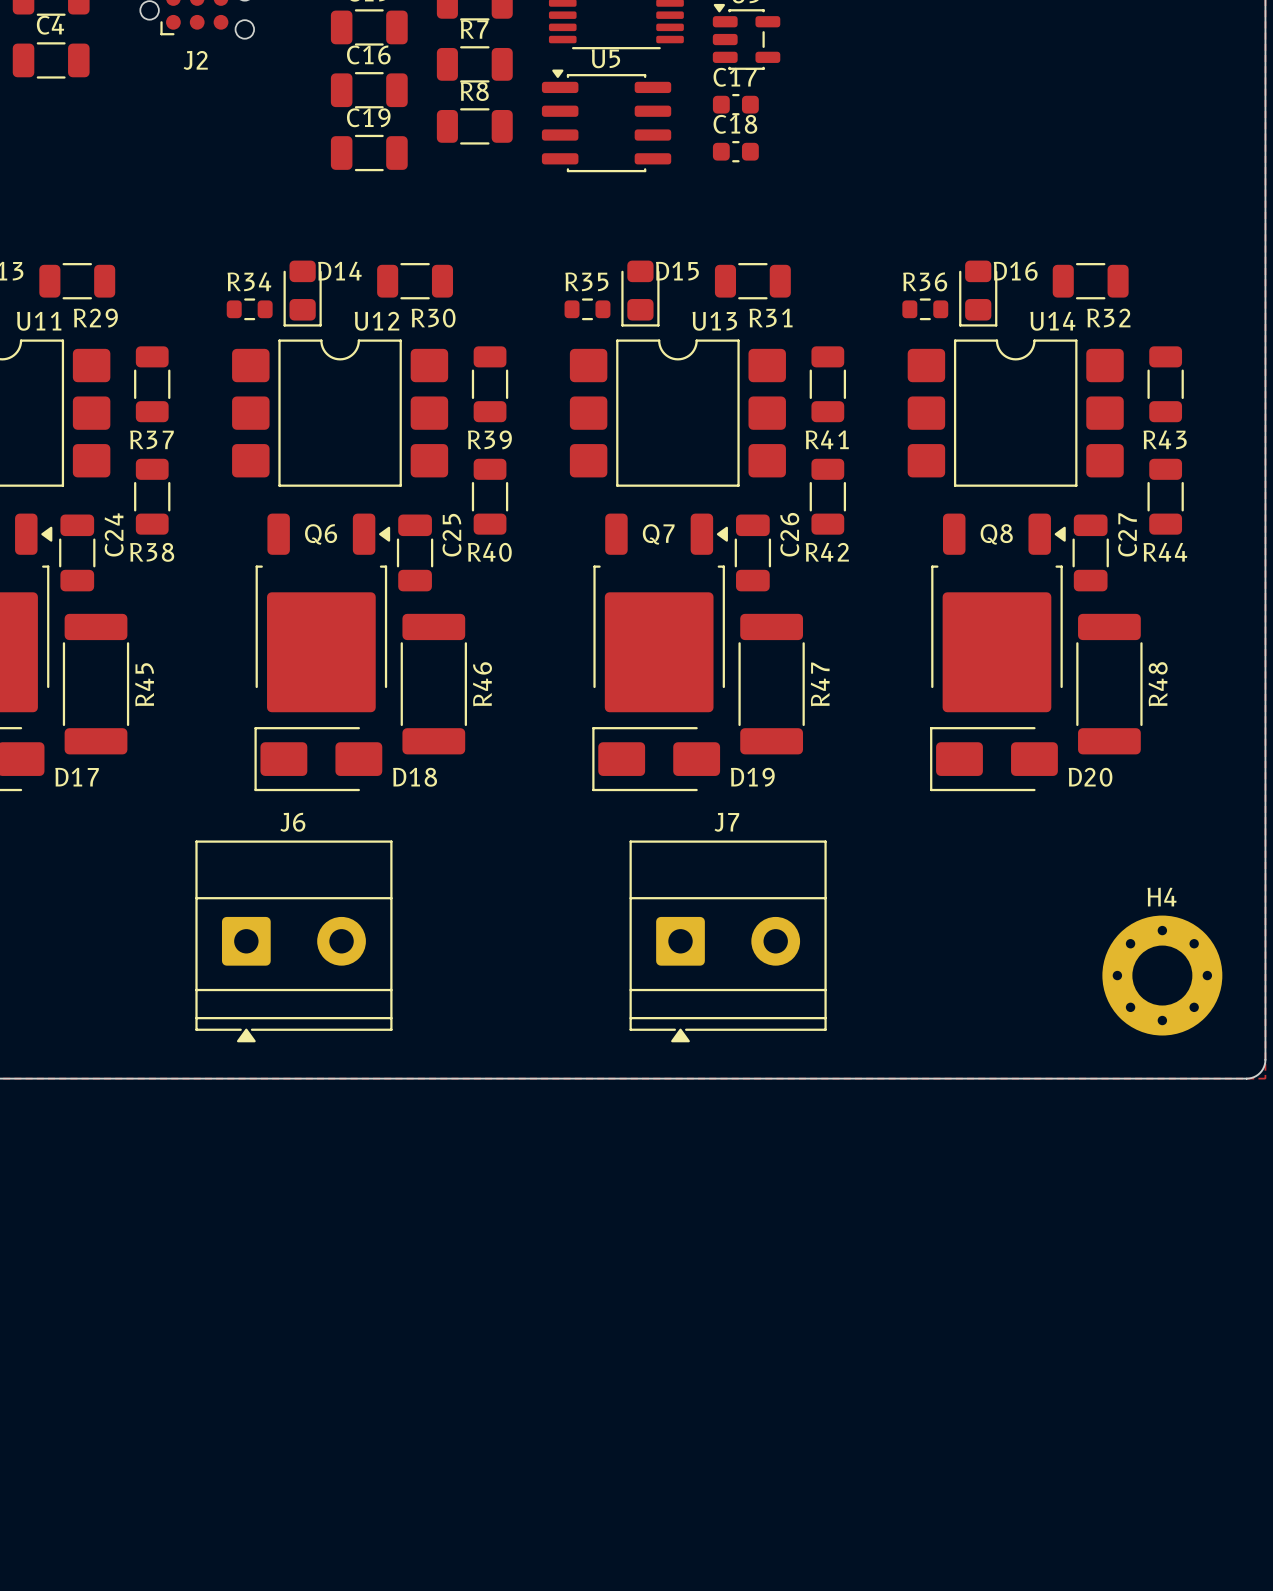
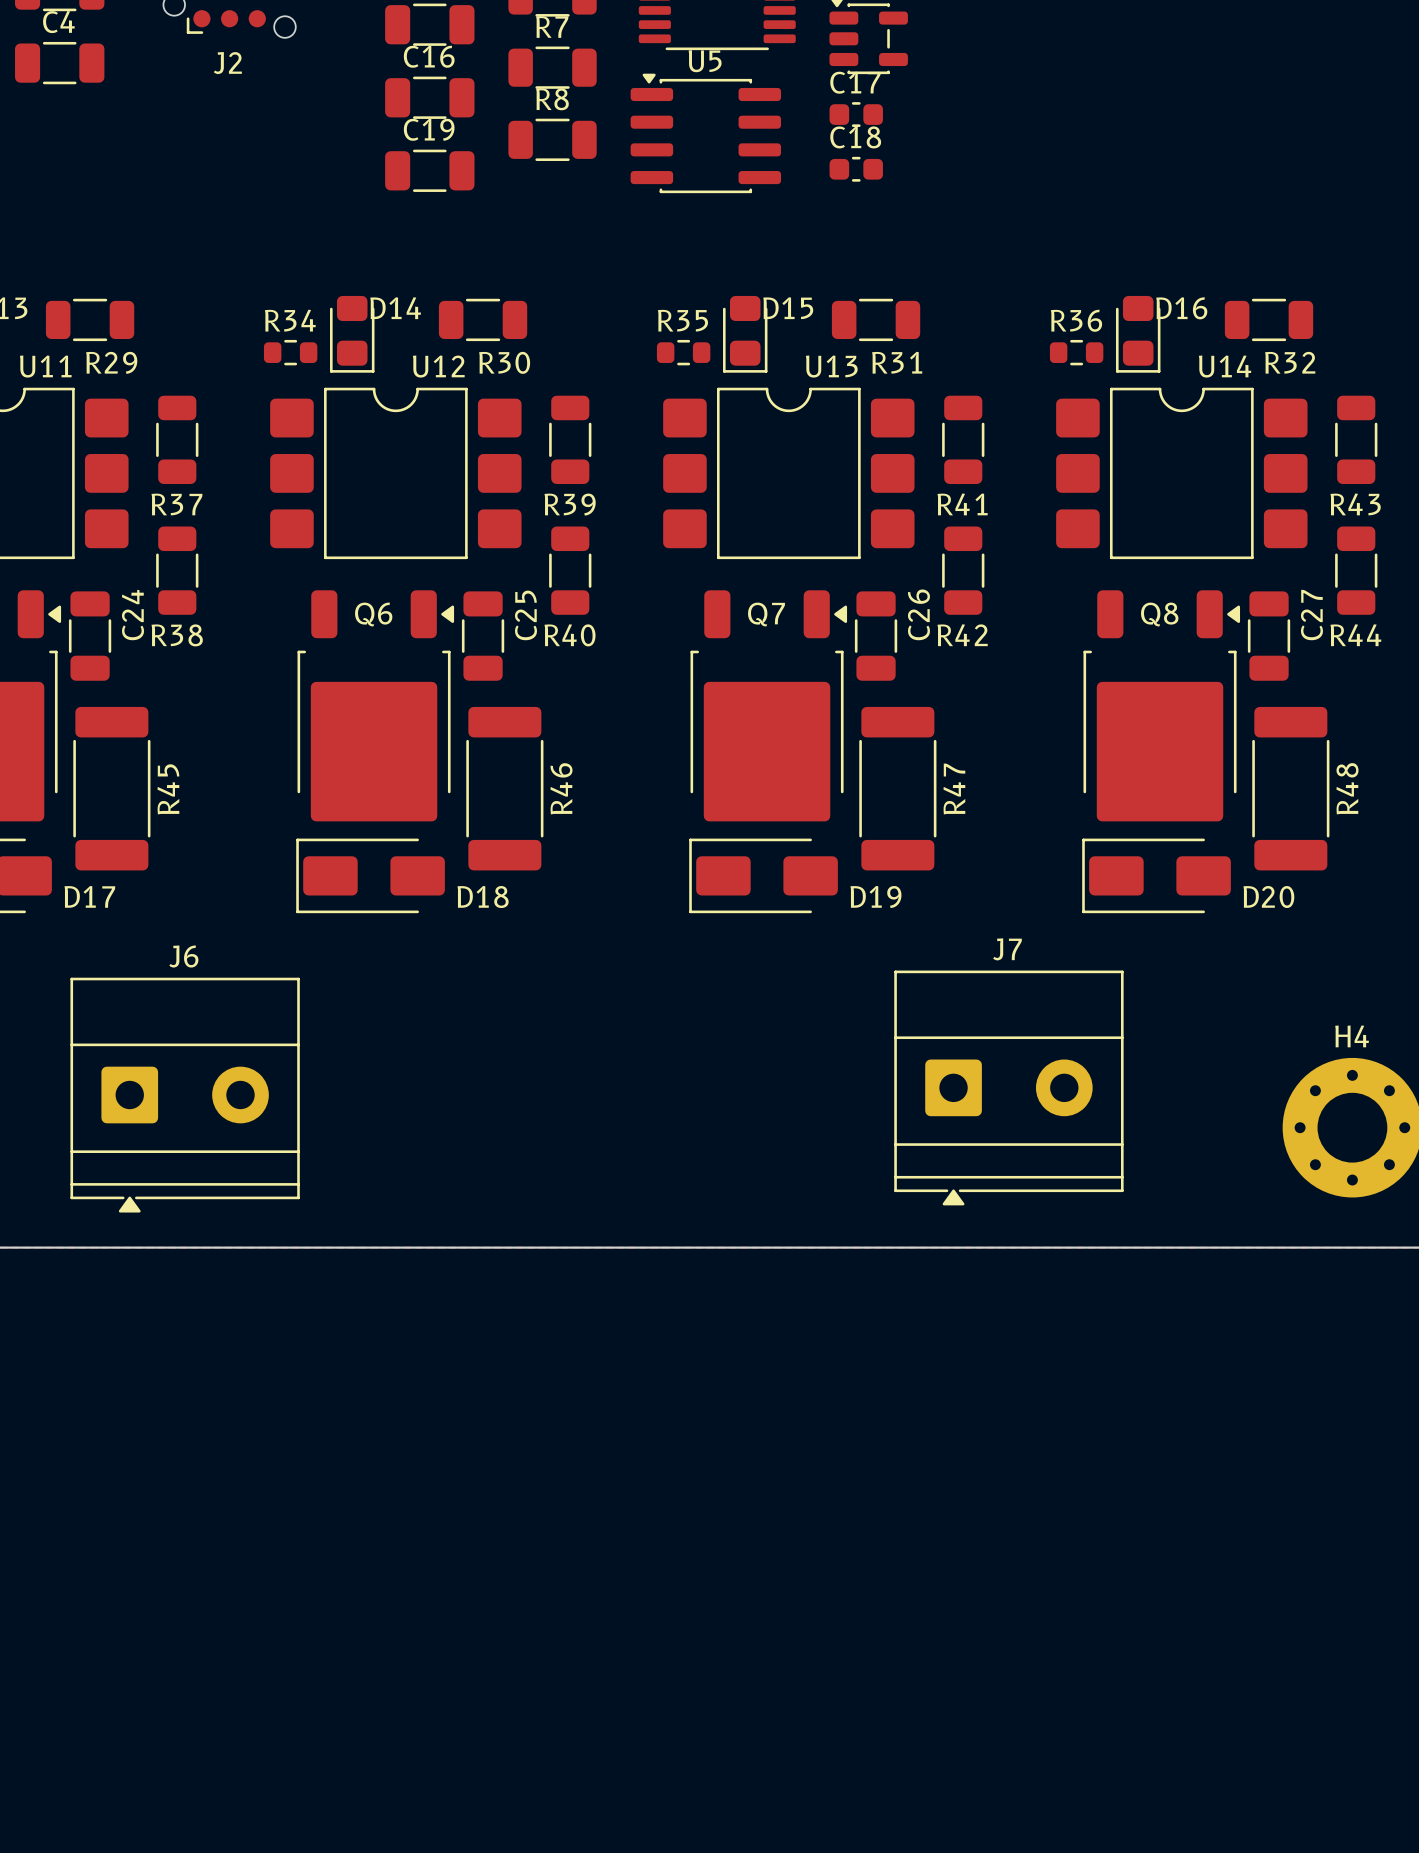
J6 position: (293, 941) -> (185, 1095)
J7 position: (728, 941) -> (1008, 1087)

